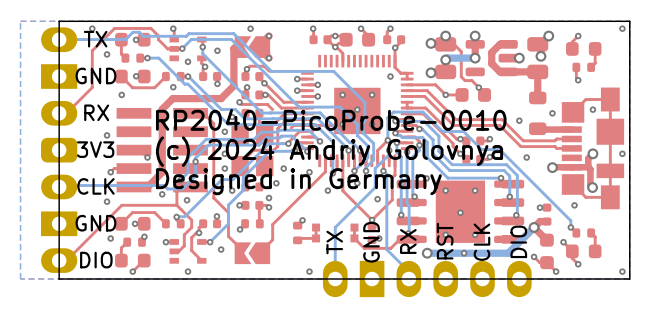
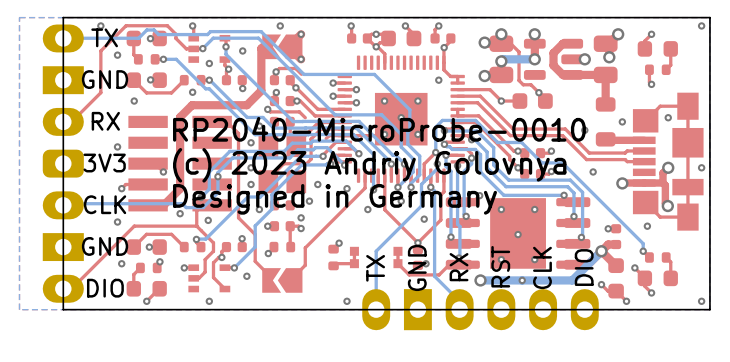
text: RP2040-PicoProbe-0010 (331, 119) -> RP2040-MicroProbe-0010 (379, 129)
text: (c) 2024 Andriy Golovnya (329, 151) -> (c) 2023 Andriy Golovnya (369, 165)

